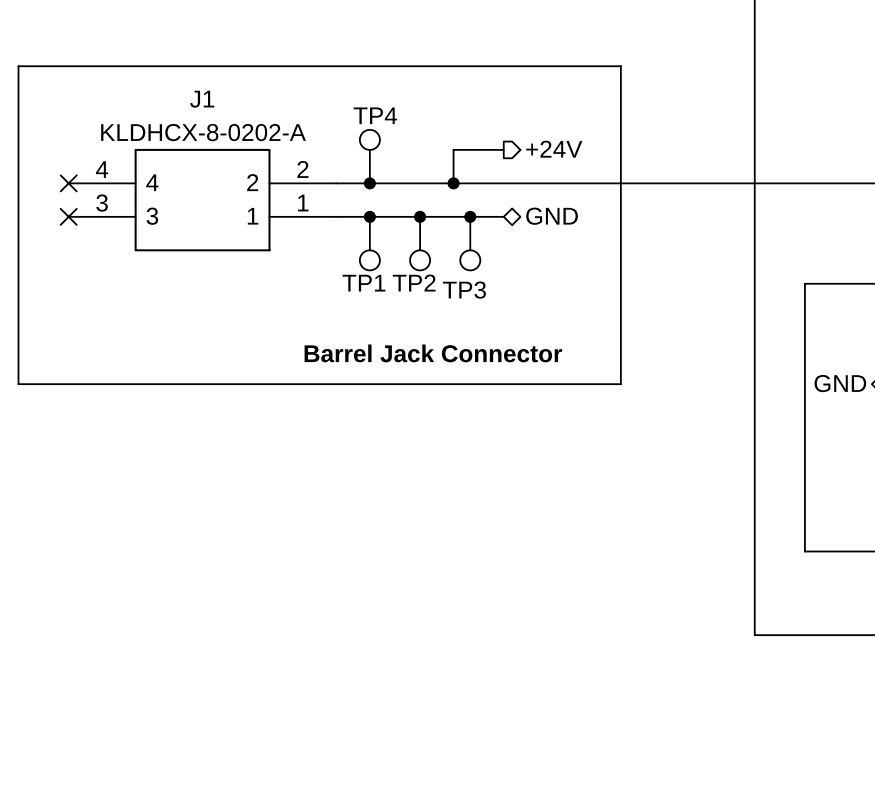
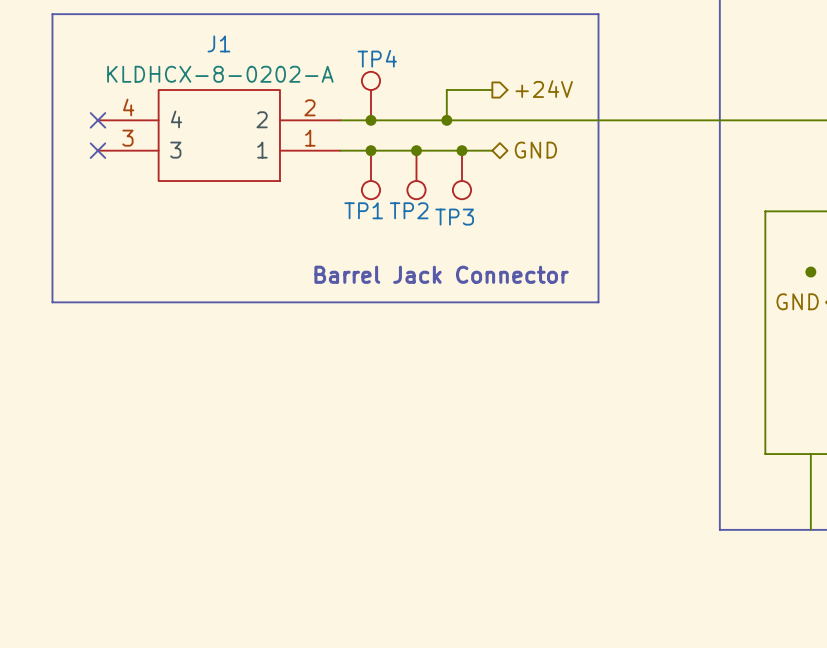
junction: none -> (810, 272)
wire: none -> (810, 454) (810, 529)

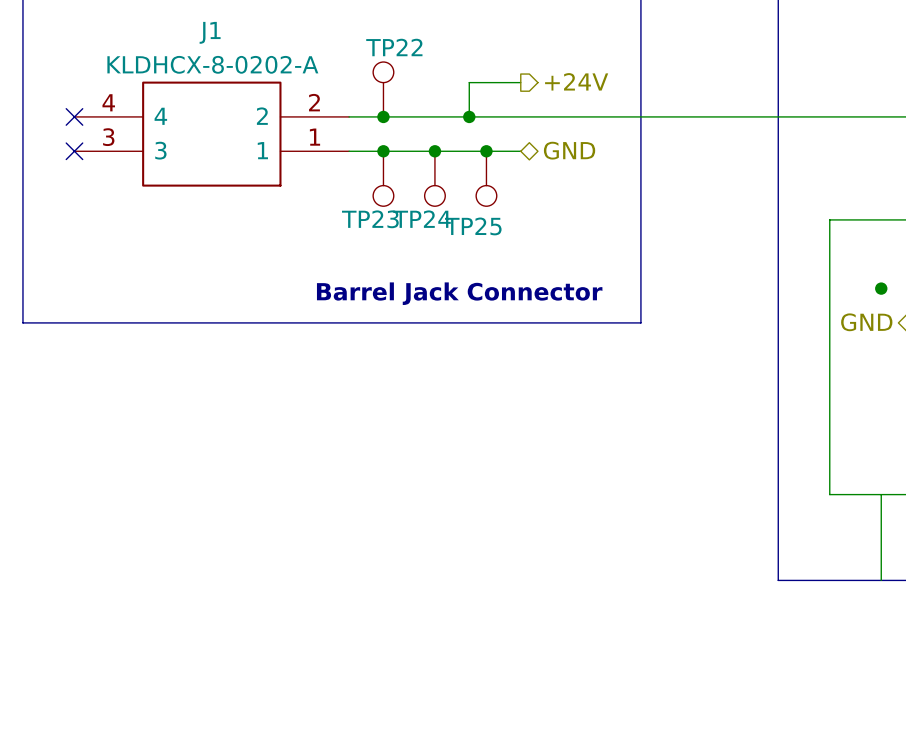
TP4 name: TP4 (377, 58) -> TP22 (394, 47)
TP1 name: TP1 (363, 210) -> TP23 (370, 219)
TP2 name: TP2 (409, 210) -> TP24 (422, 219)
TP3 name: TP3 (454, 217) -> TP25 (473, 226)

